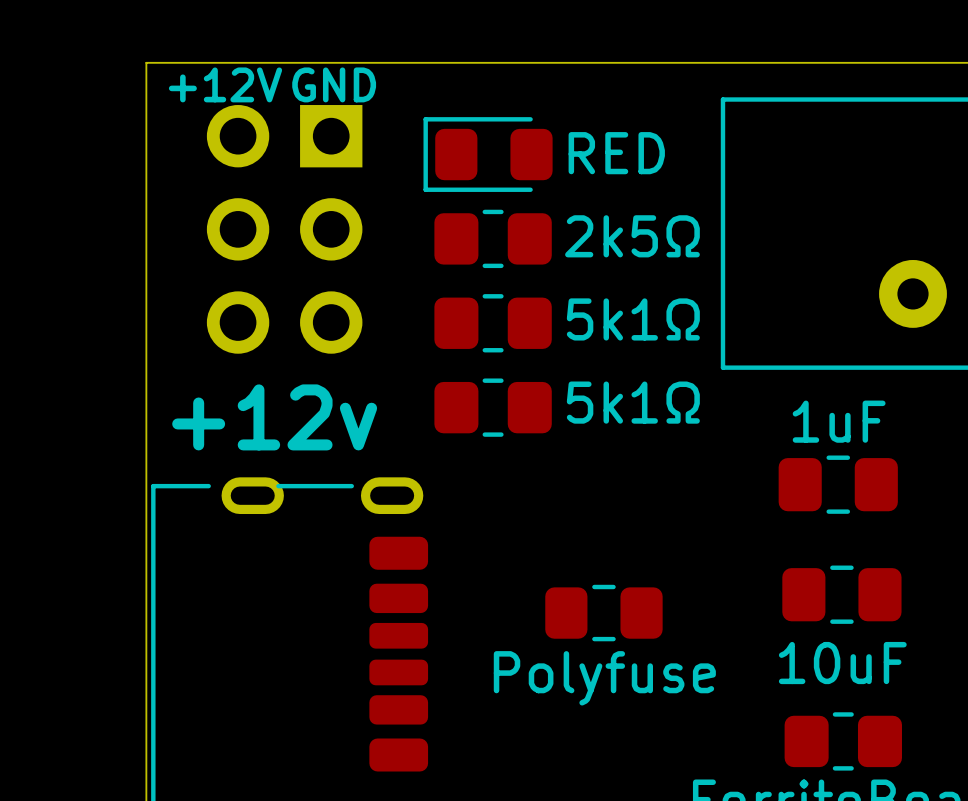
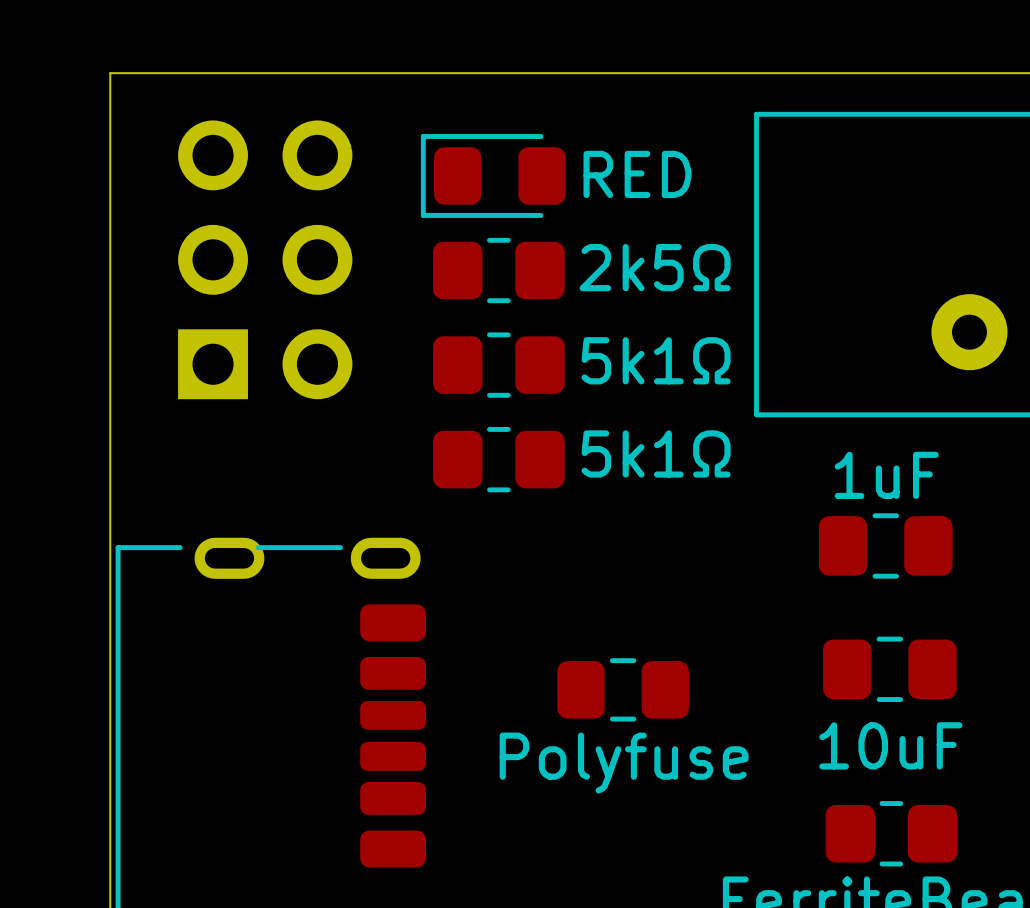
text: +12V (225, 84) -> none
text: GND (334, 84) -> none
part rotation: 0° (284, 229) -> 180° (265, 259)
text: +12v (274, 417) -> none

